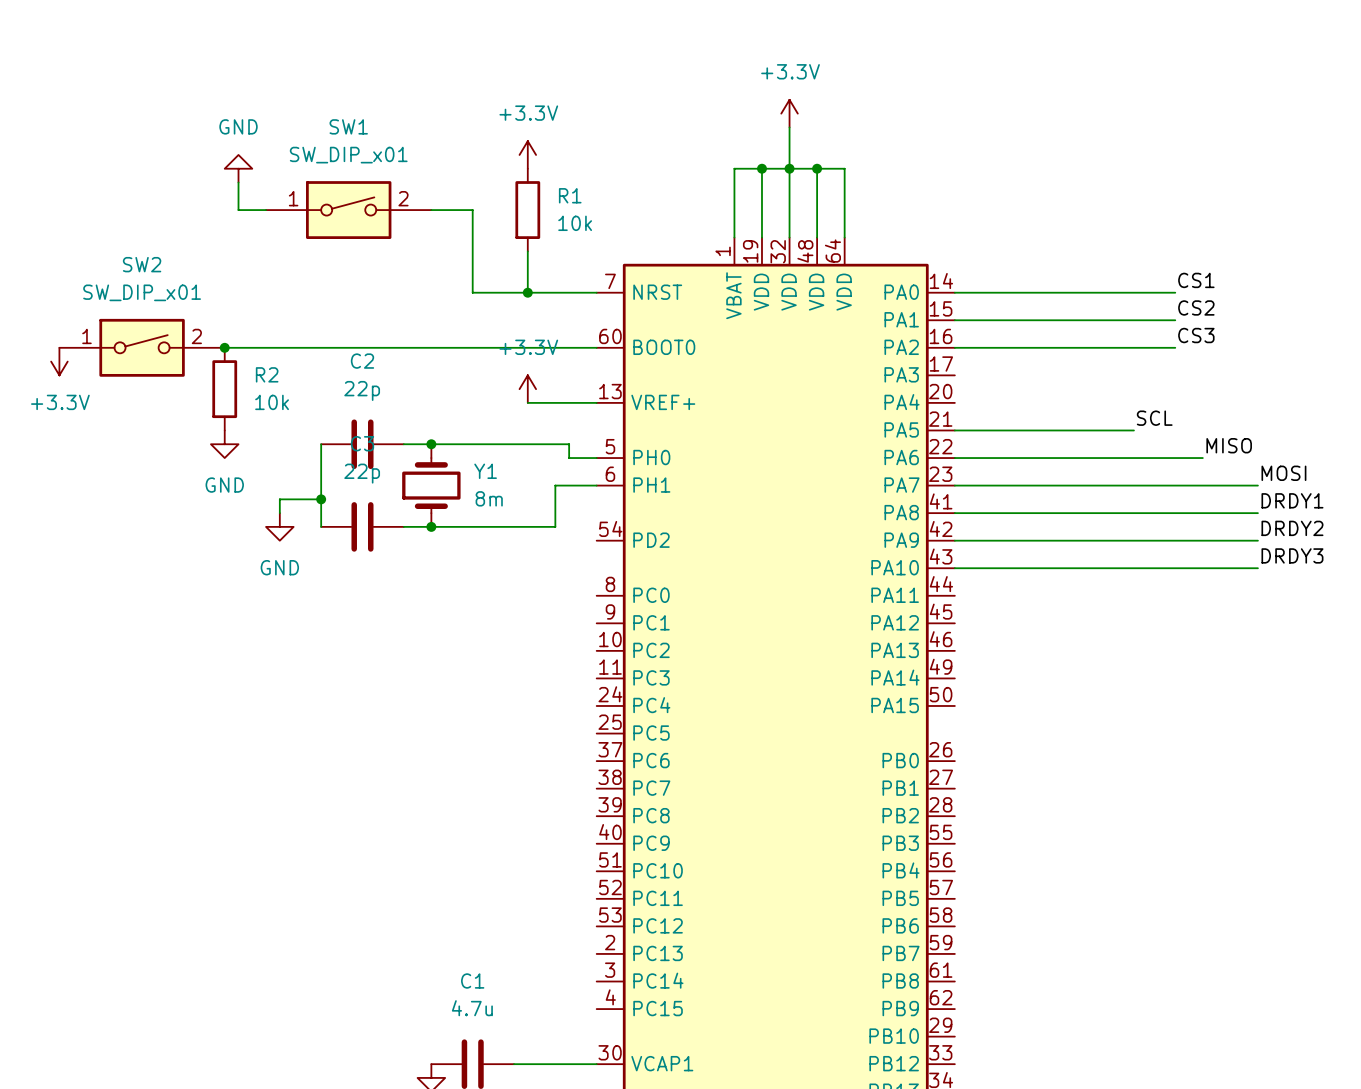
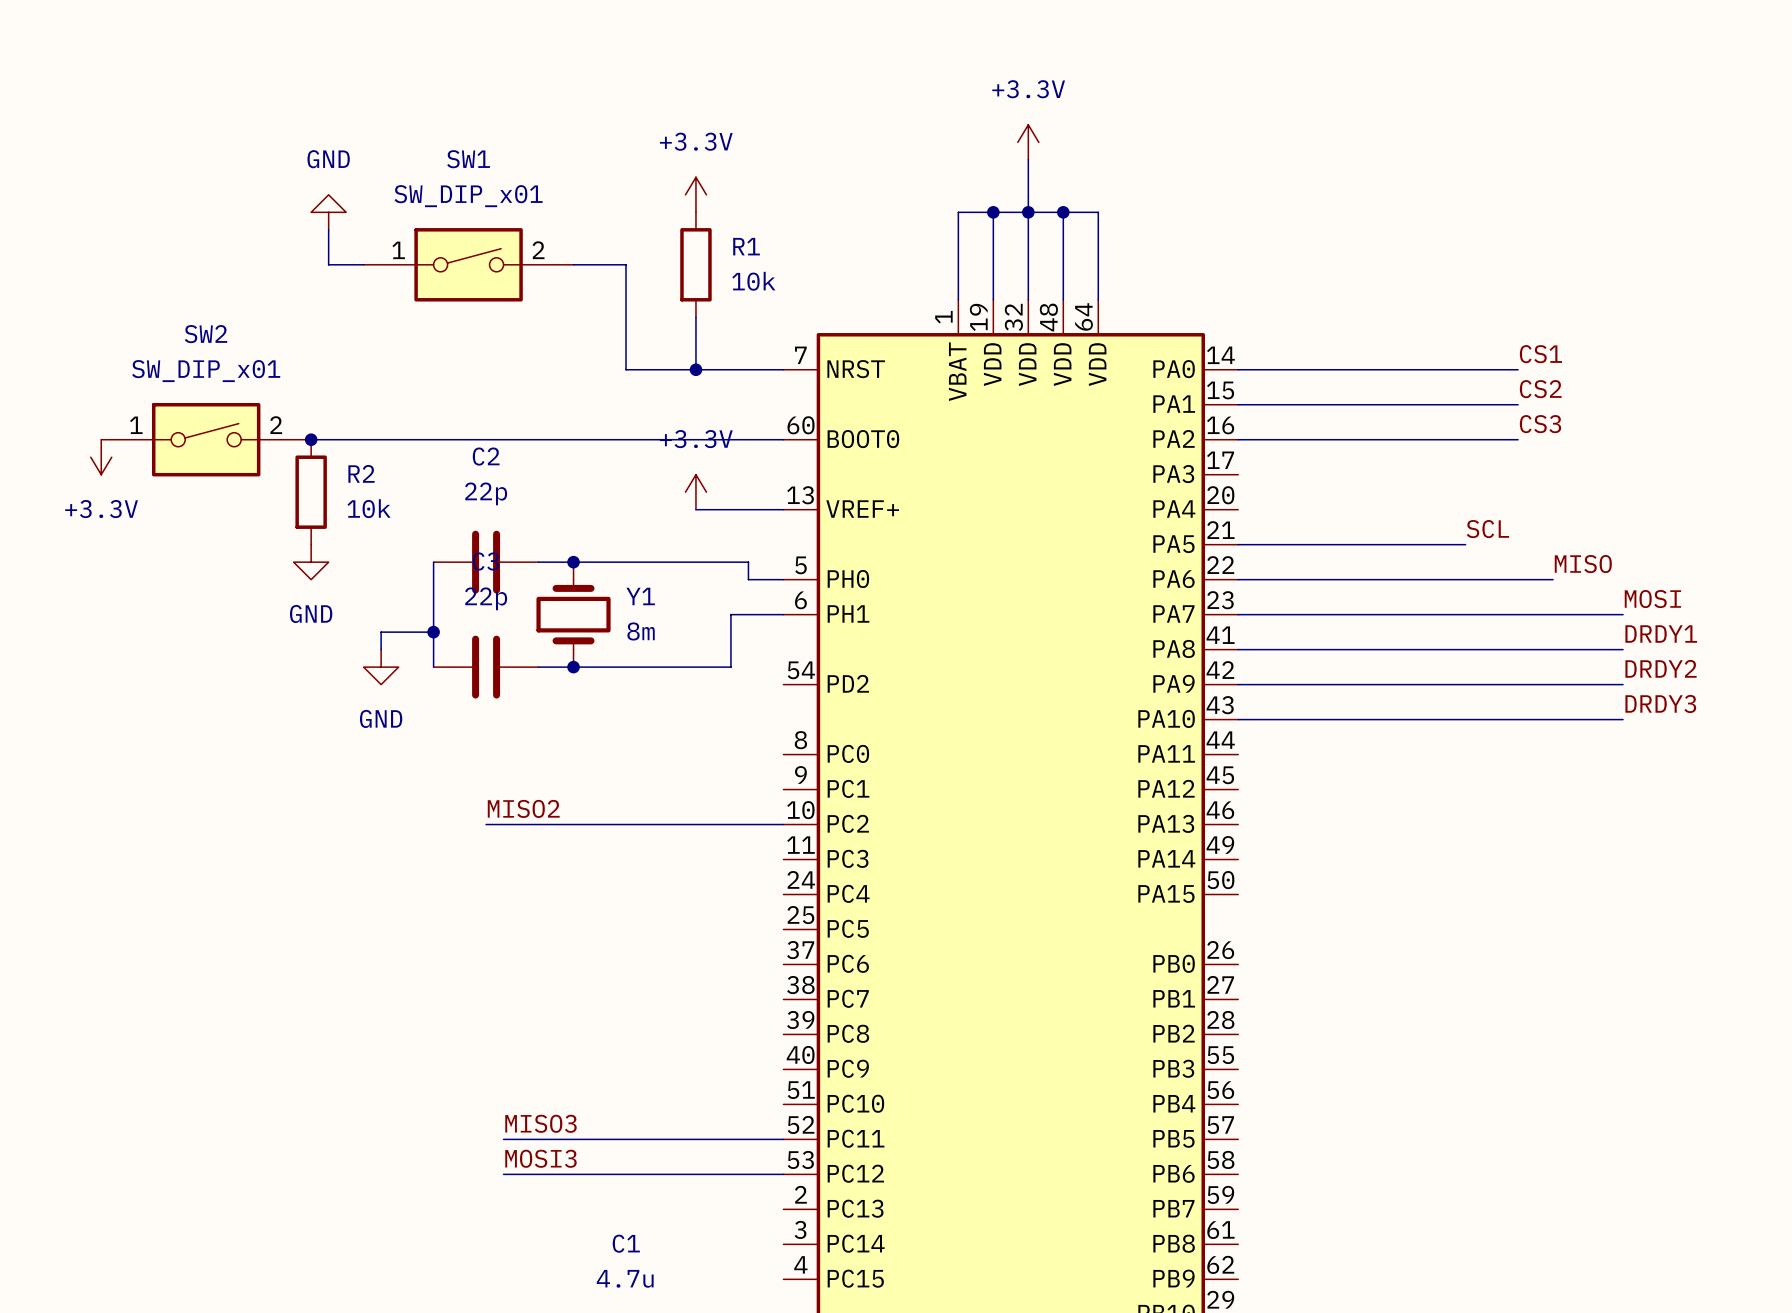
label: none -> MISO2 (523, 808)
wire: none -> (486, 824) (783, 824)
label: none -> MISO3 (540, 1123)
wire: none -> (503, 1139) (783, 1139)
label: none -> MOSI3 (540, 1158)
wire: none -> (503, 1174) (783, 1174)

